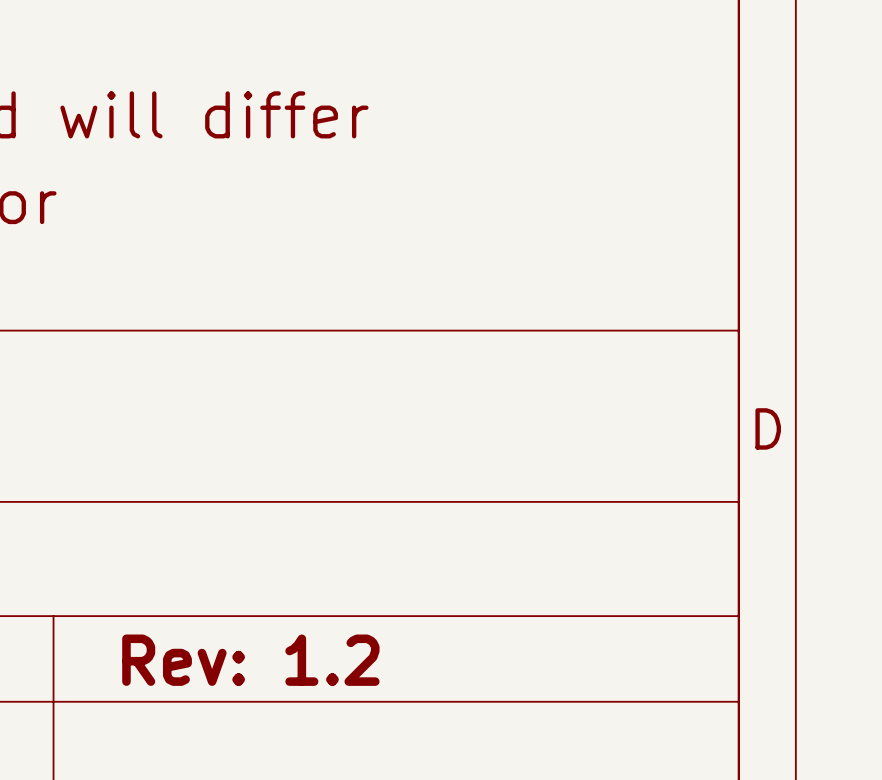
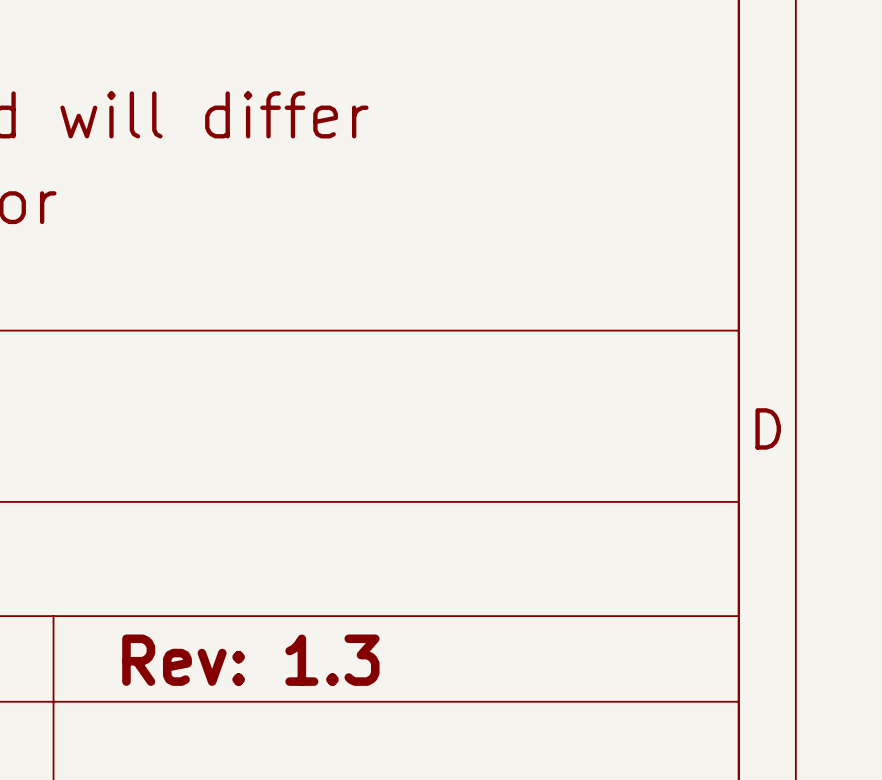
title block: Rev: 1.2 (250, 660) -> Rev: 1.3 (250, 660)

